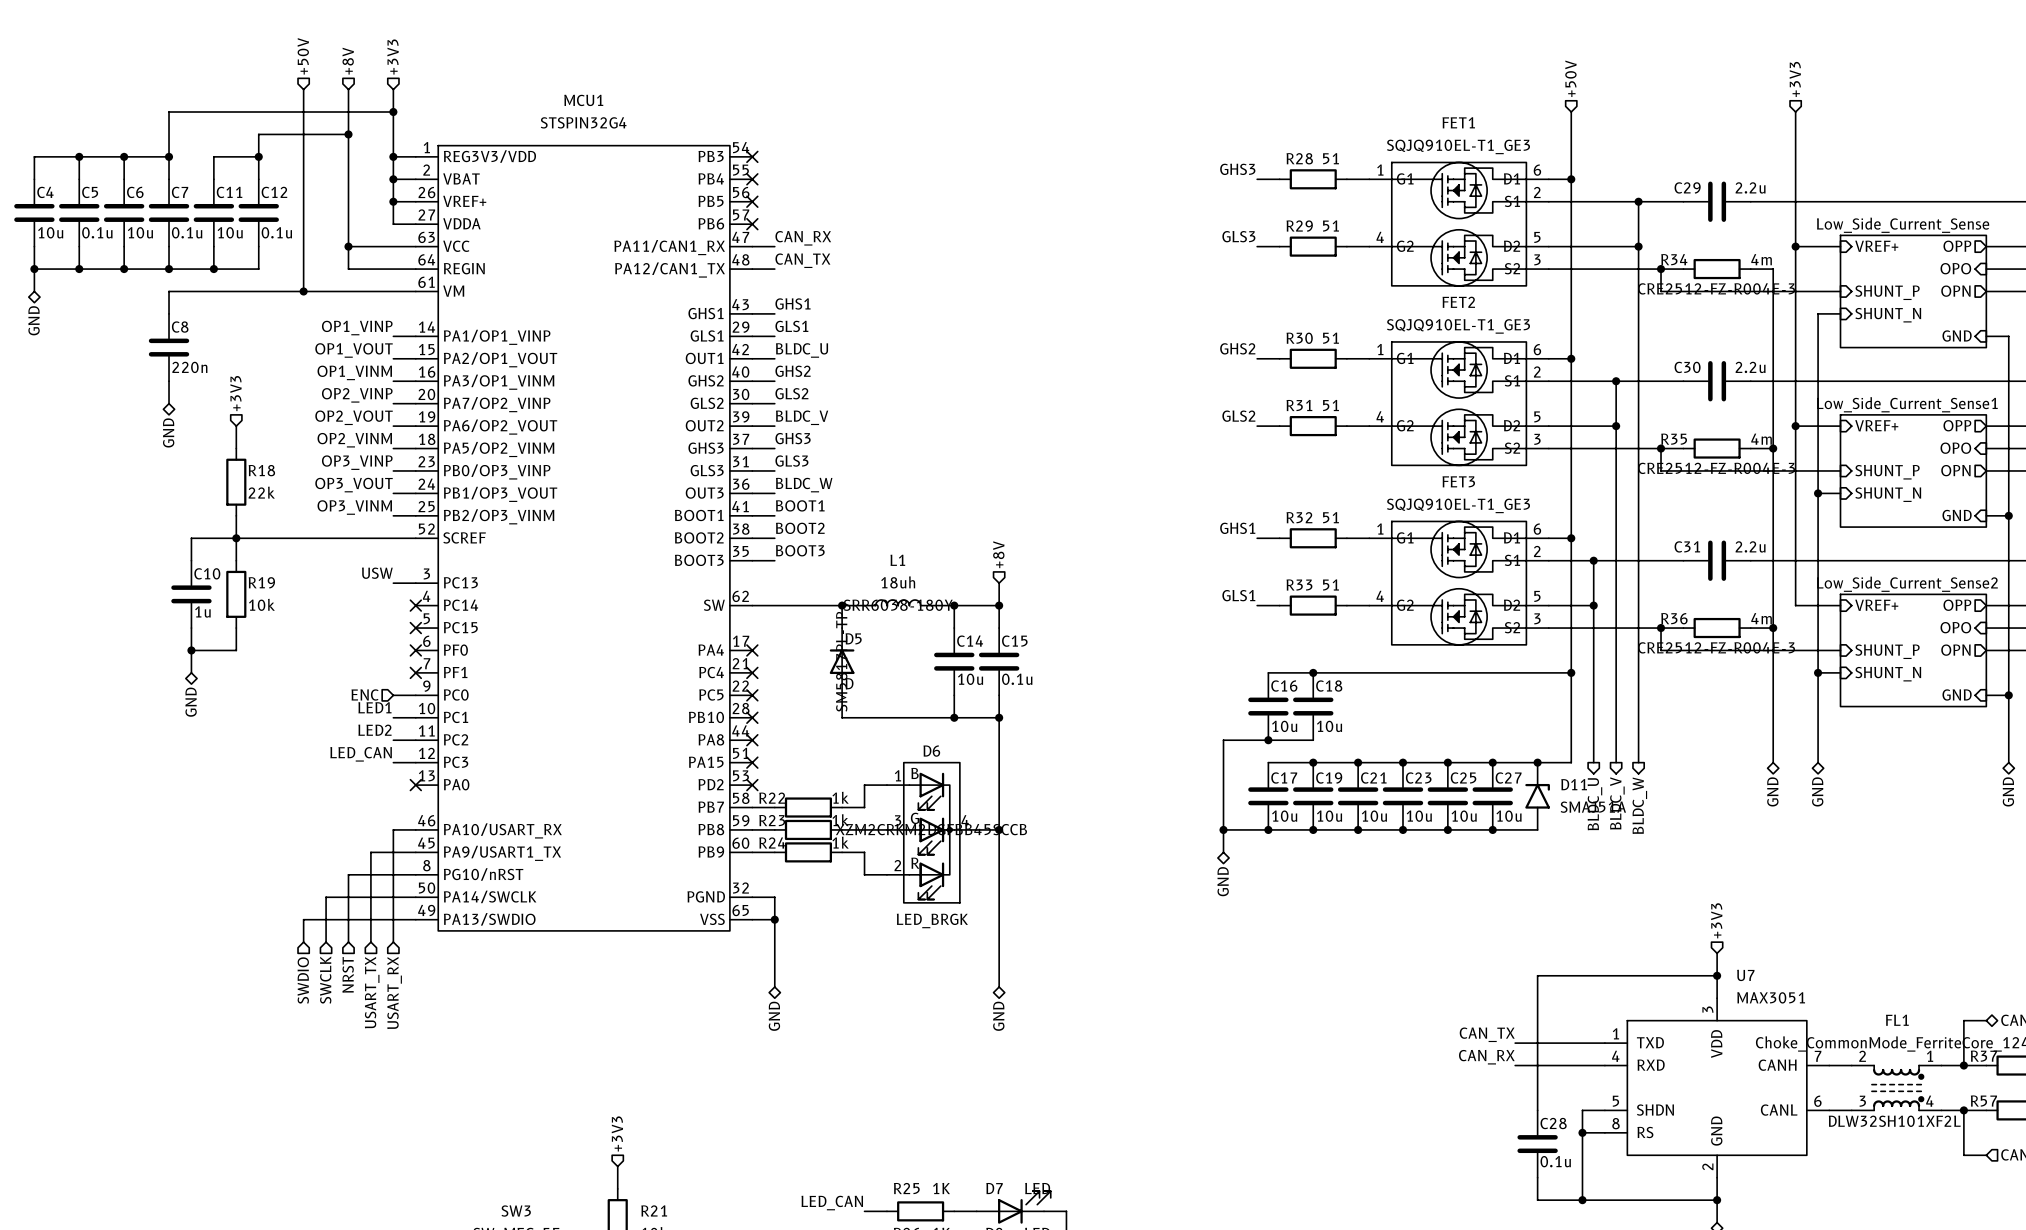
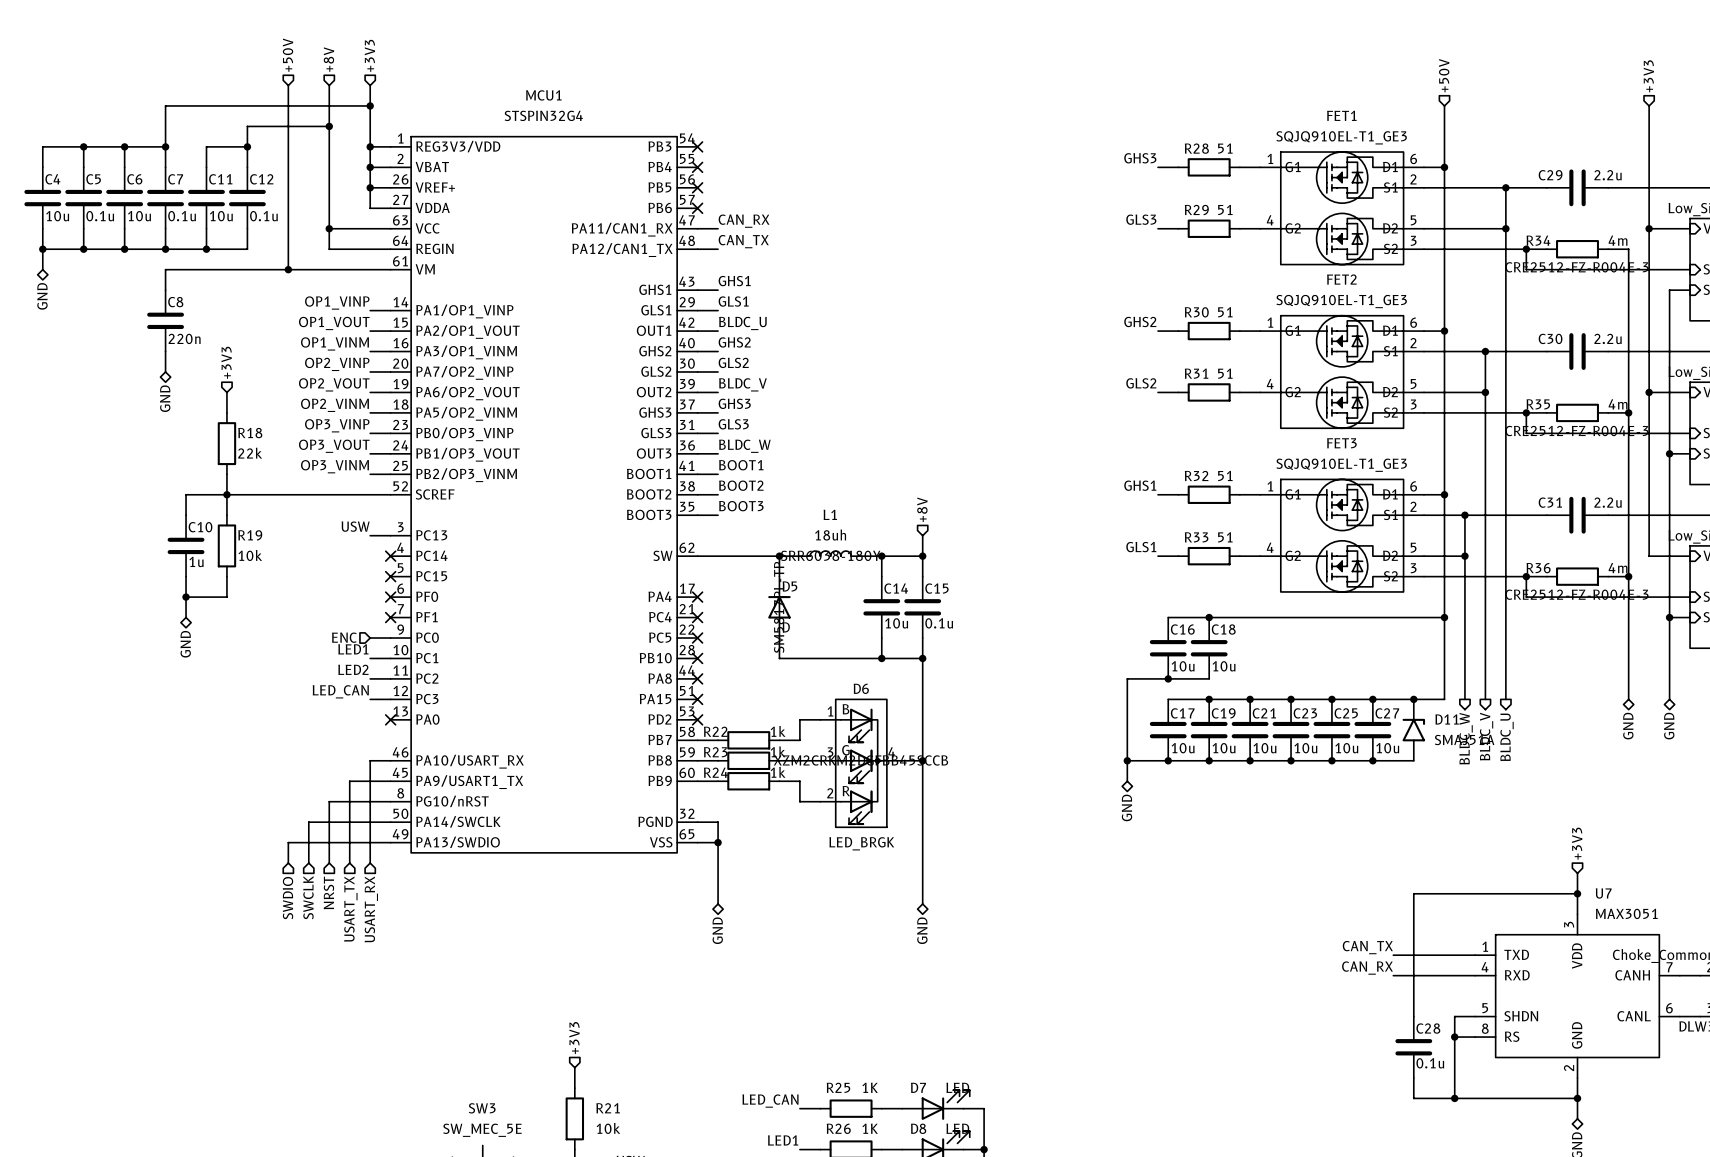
hierarchical label: BLDC_U (1594, 804) -> BLDC_W (1466, 738)
hierarchical label: BLDC_W (1639, 805) -> BLDC_U (1507, 737)

